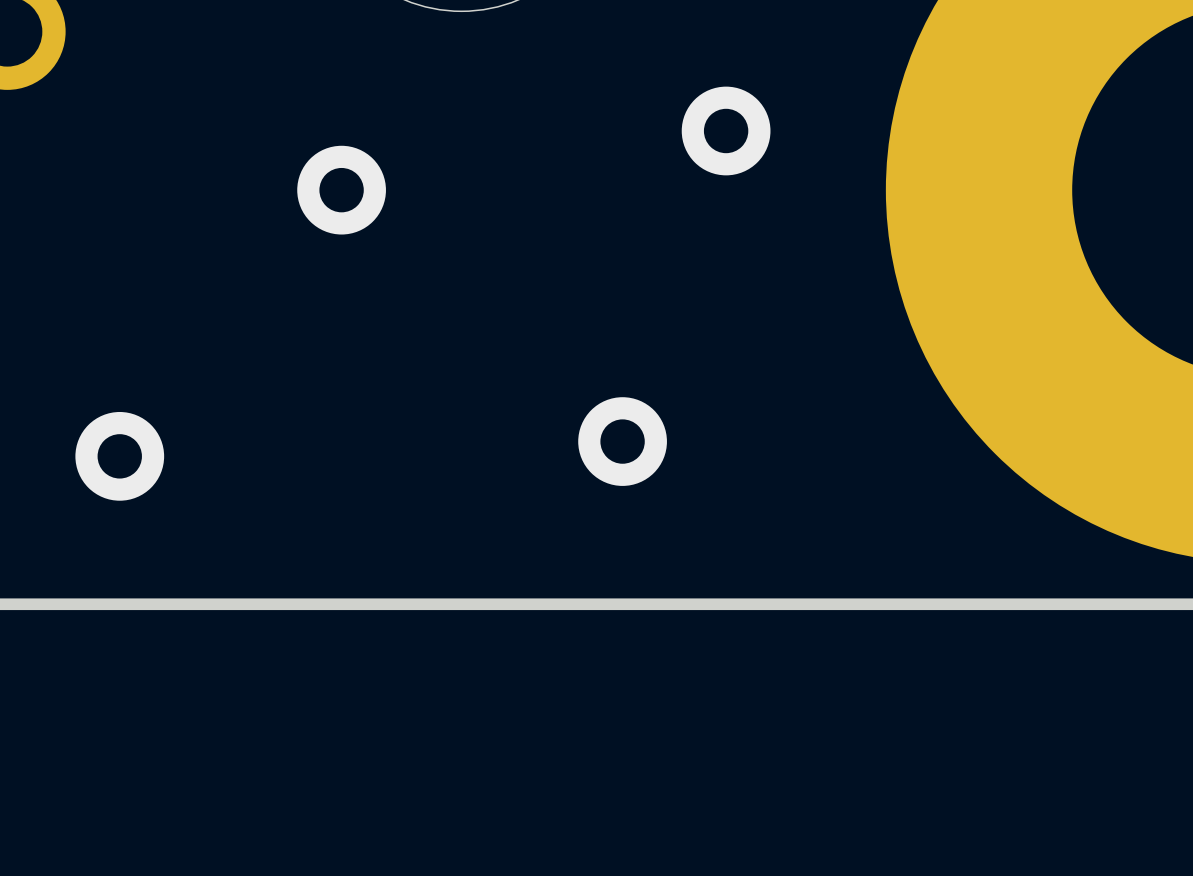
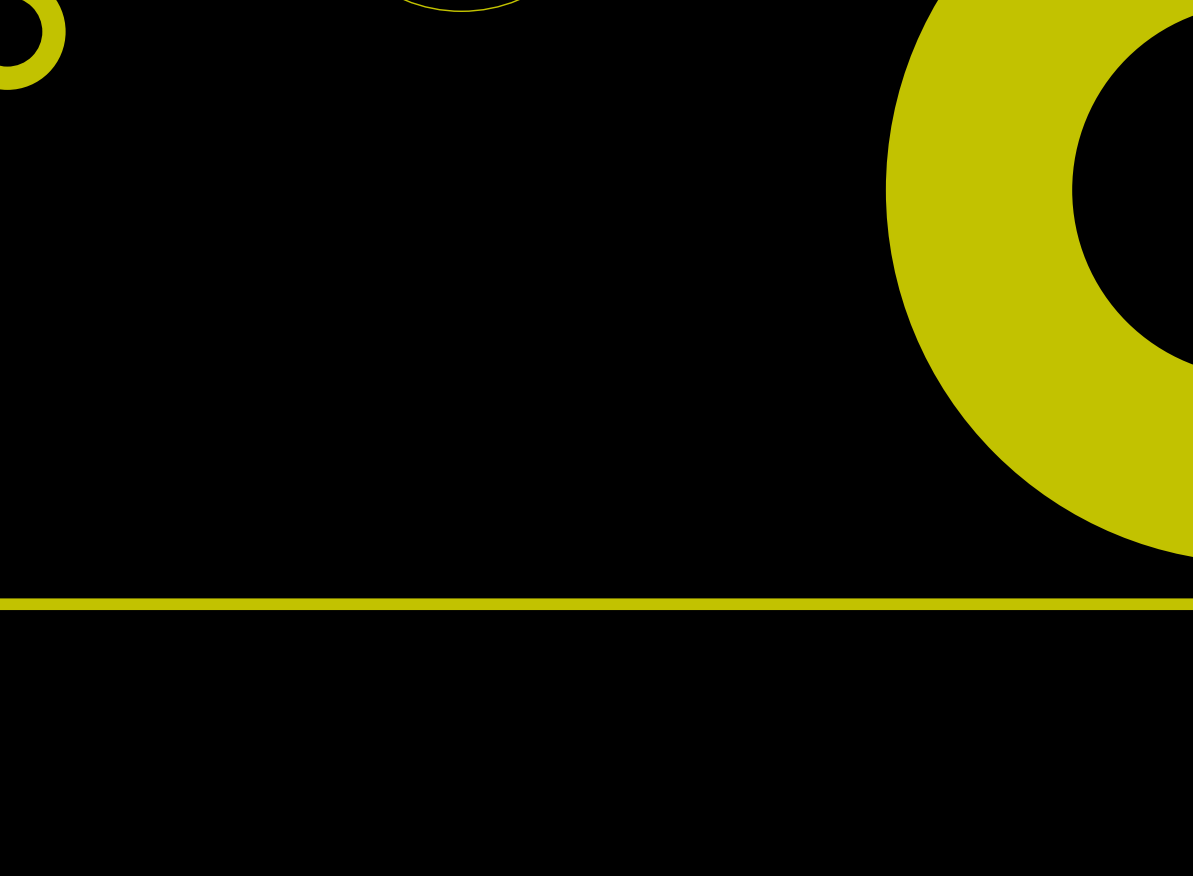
via: (726, 130) -> none
via: (341, 190) -> none
via: (622, 441) -> none
via: (119, 456) -> none

